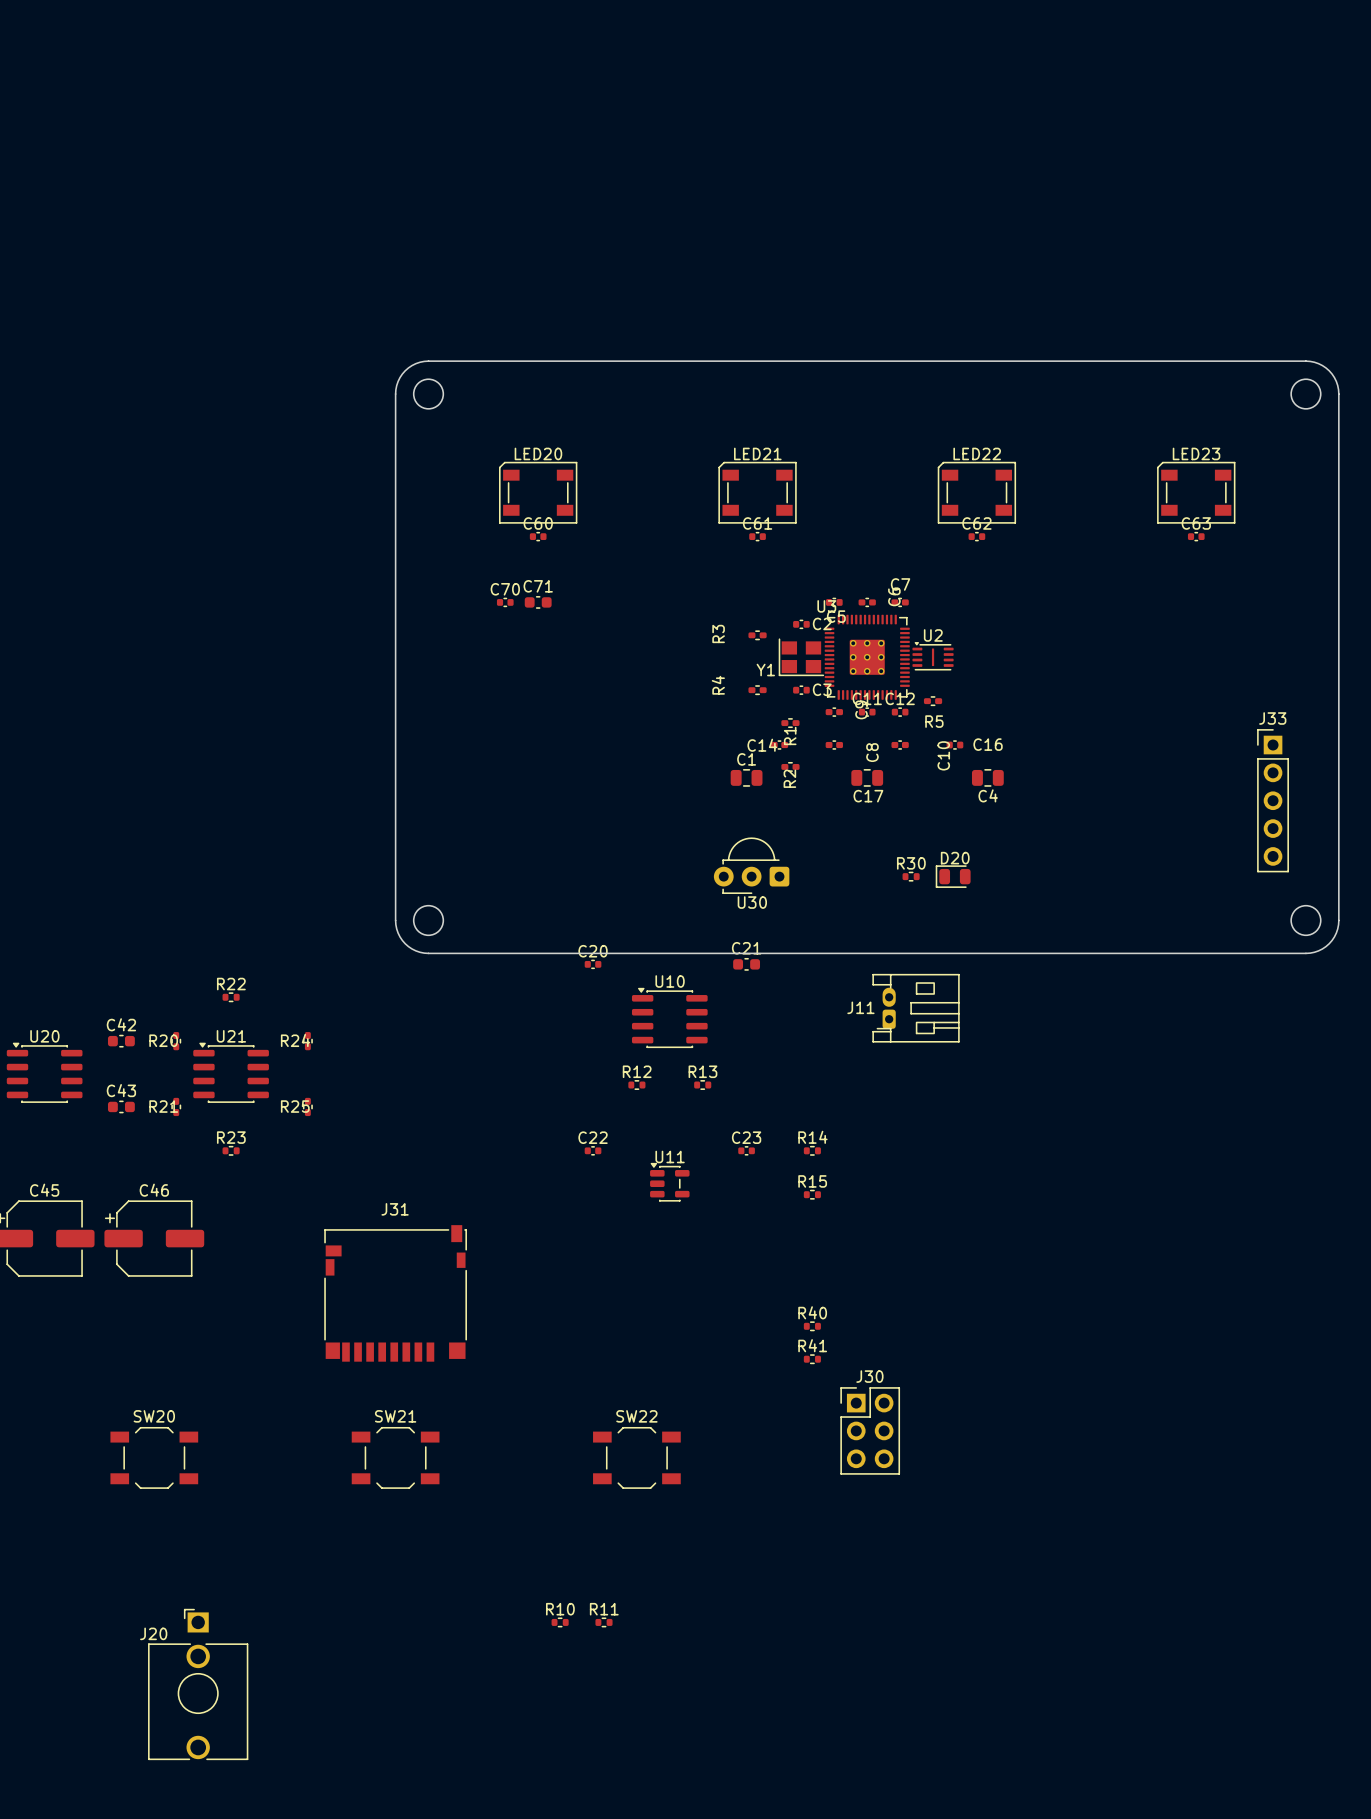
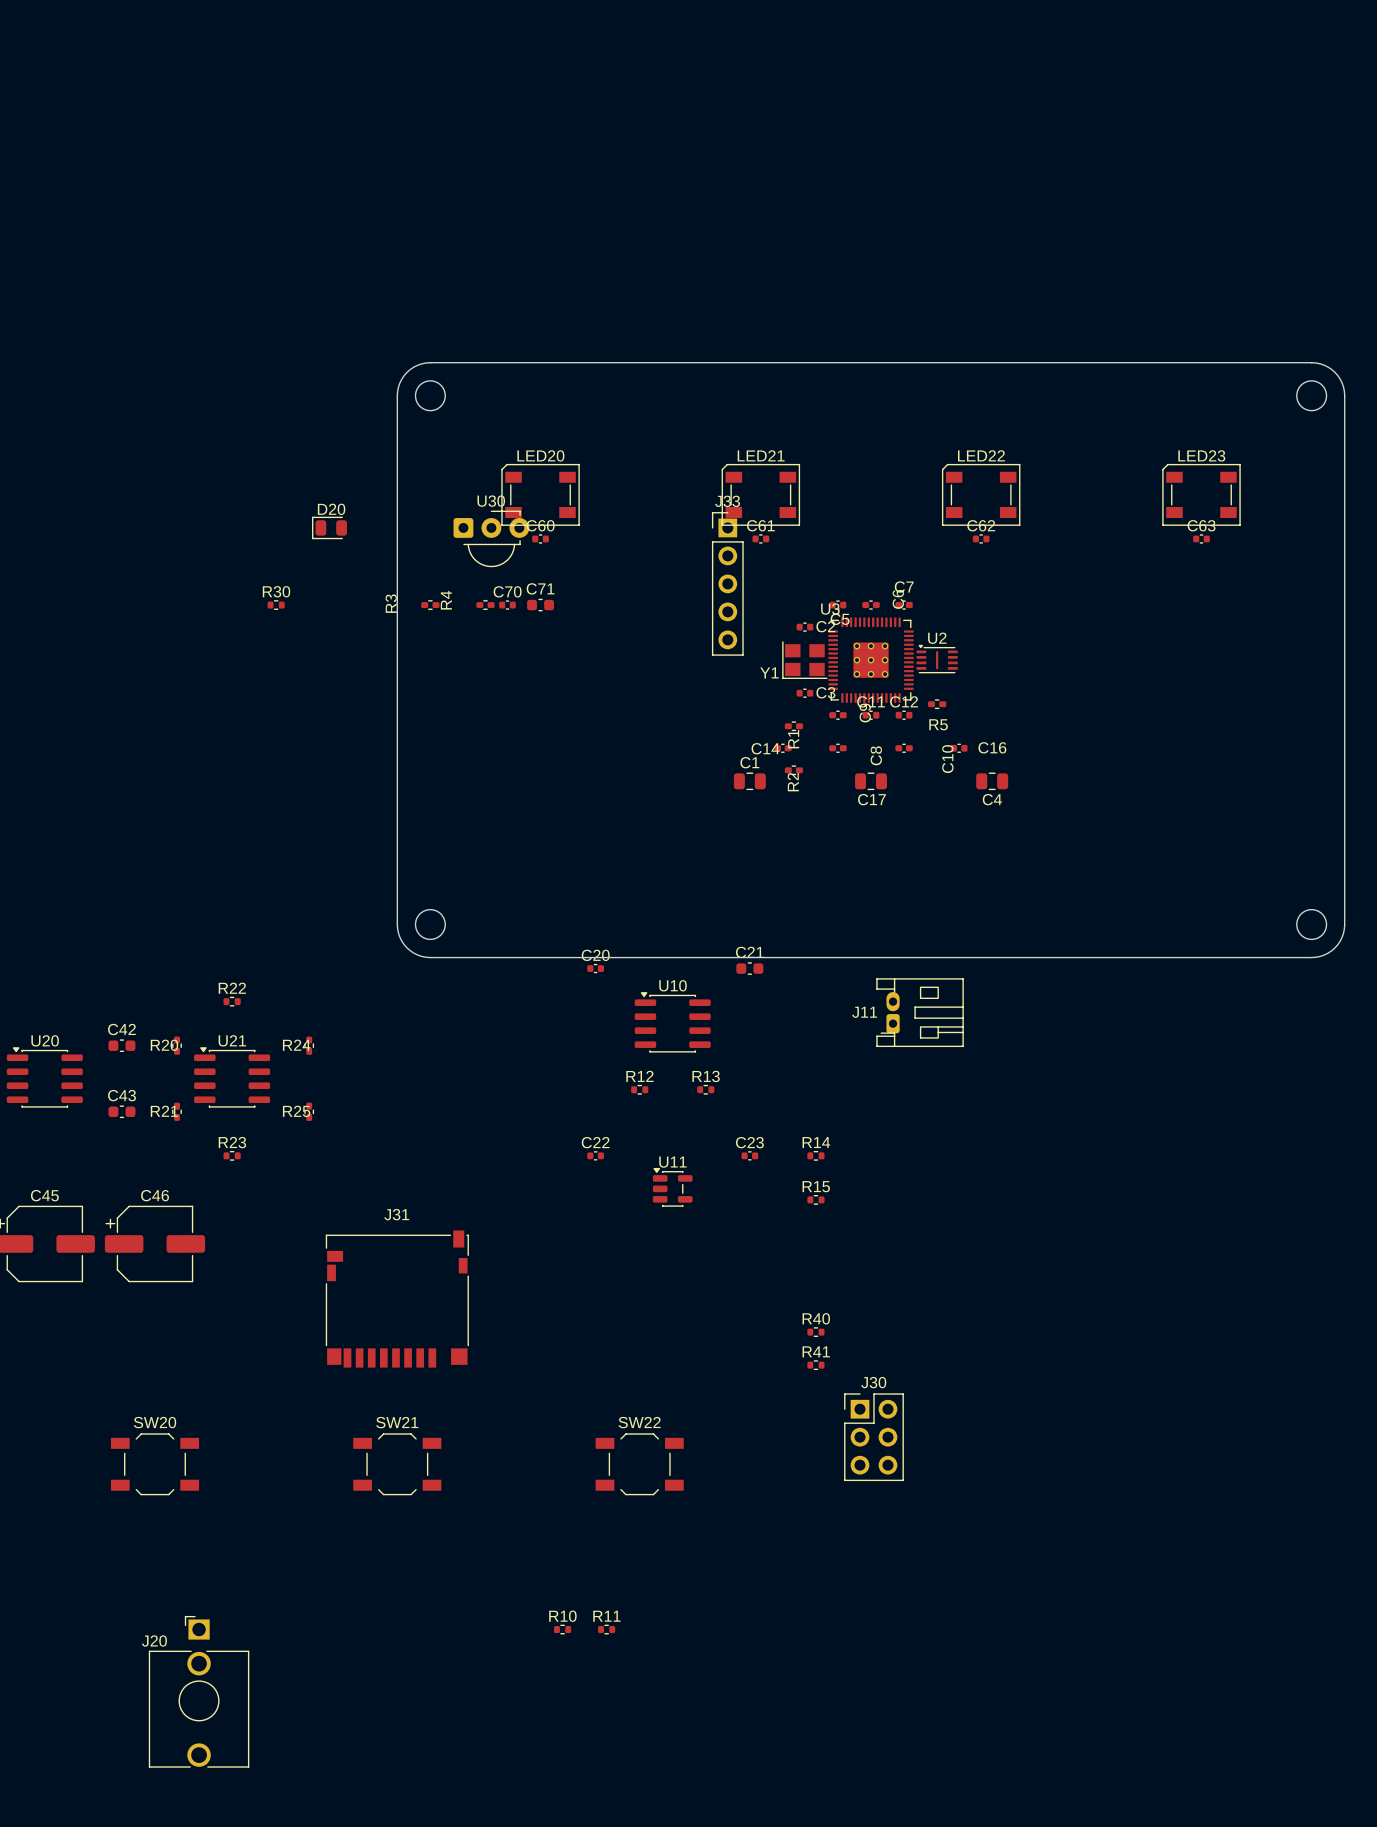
R3 position: (757, 635) -> (430, 605)
R4 position: (757, 690) -> (485, 605)
J33 position: (1273, 800) -> (727, 583)
U30 rotation: 0° (751, 865) -> 180° (491, 538)
U30 position: (751, 865) -> (491, 538)
R30 position: (911, 876) -> (276, 605)
D20 position: (953, 876) -> (329, 527)

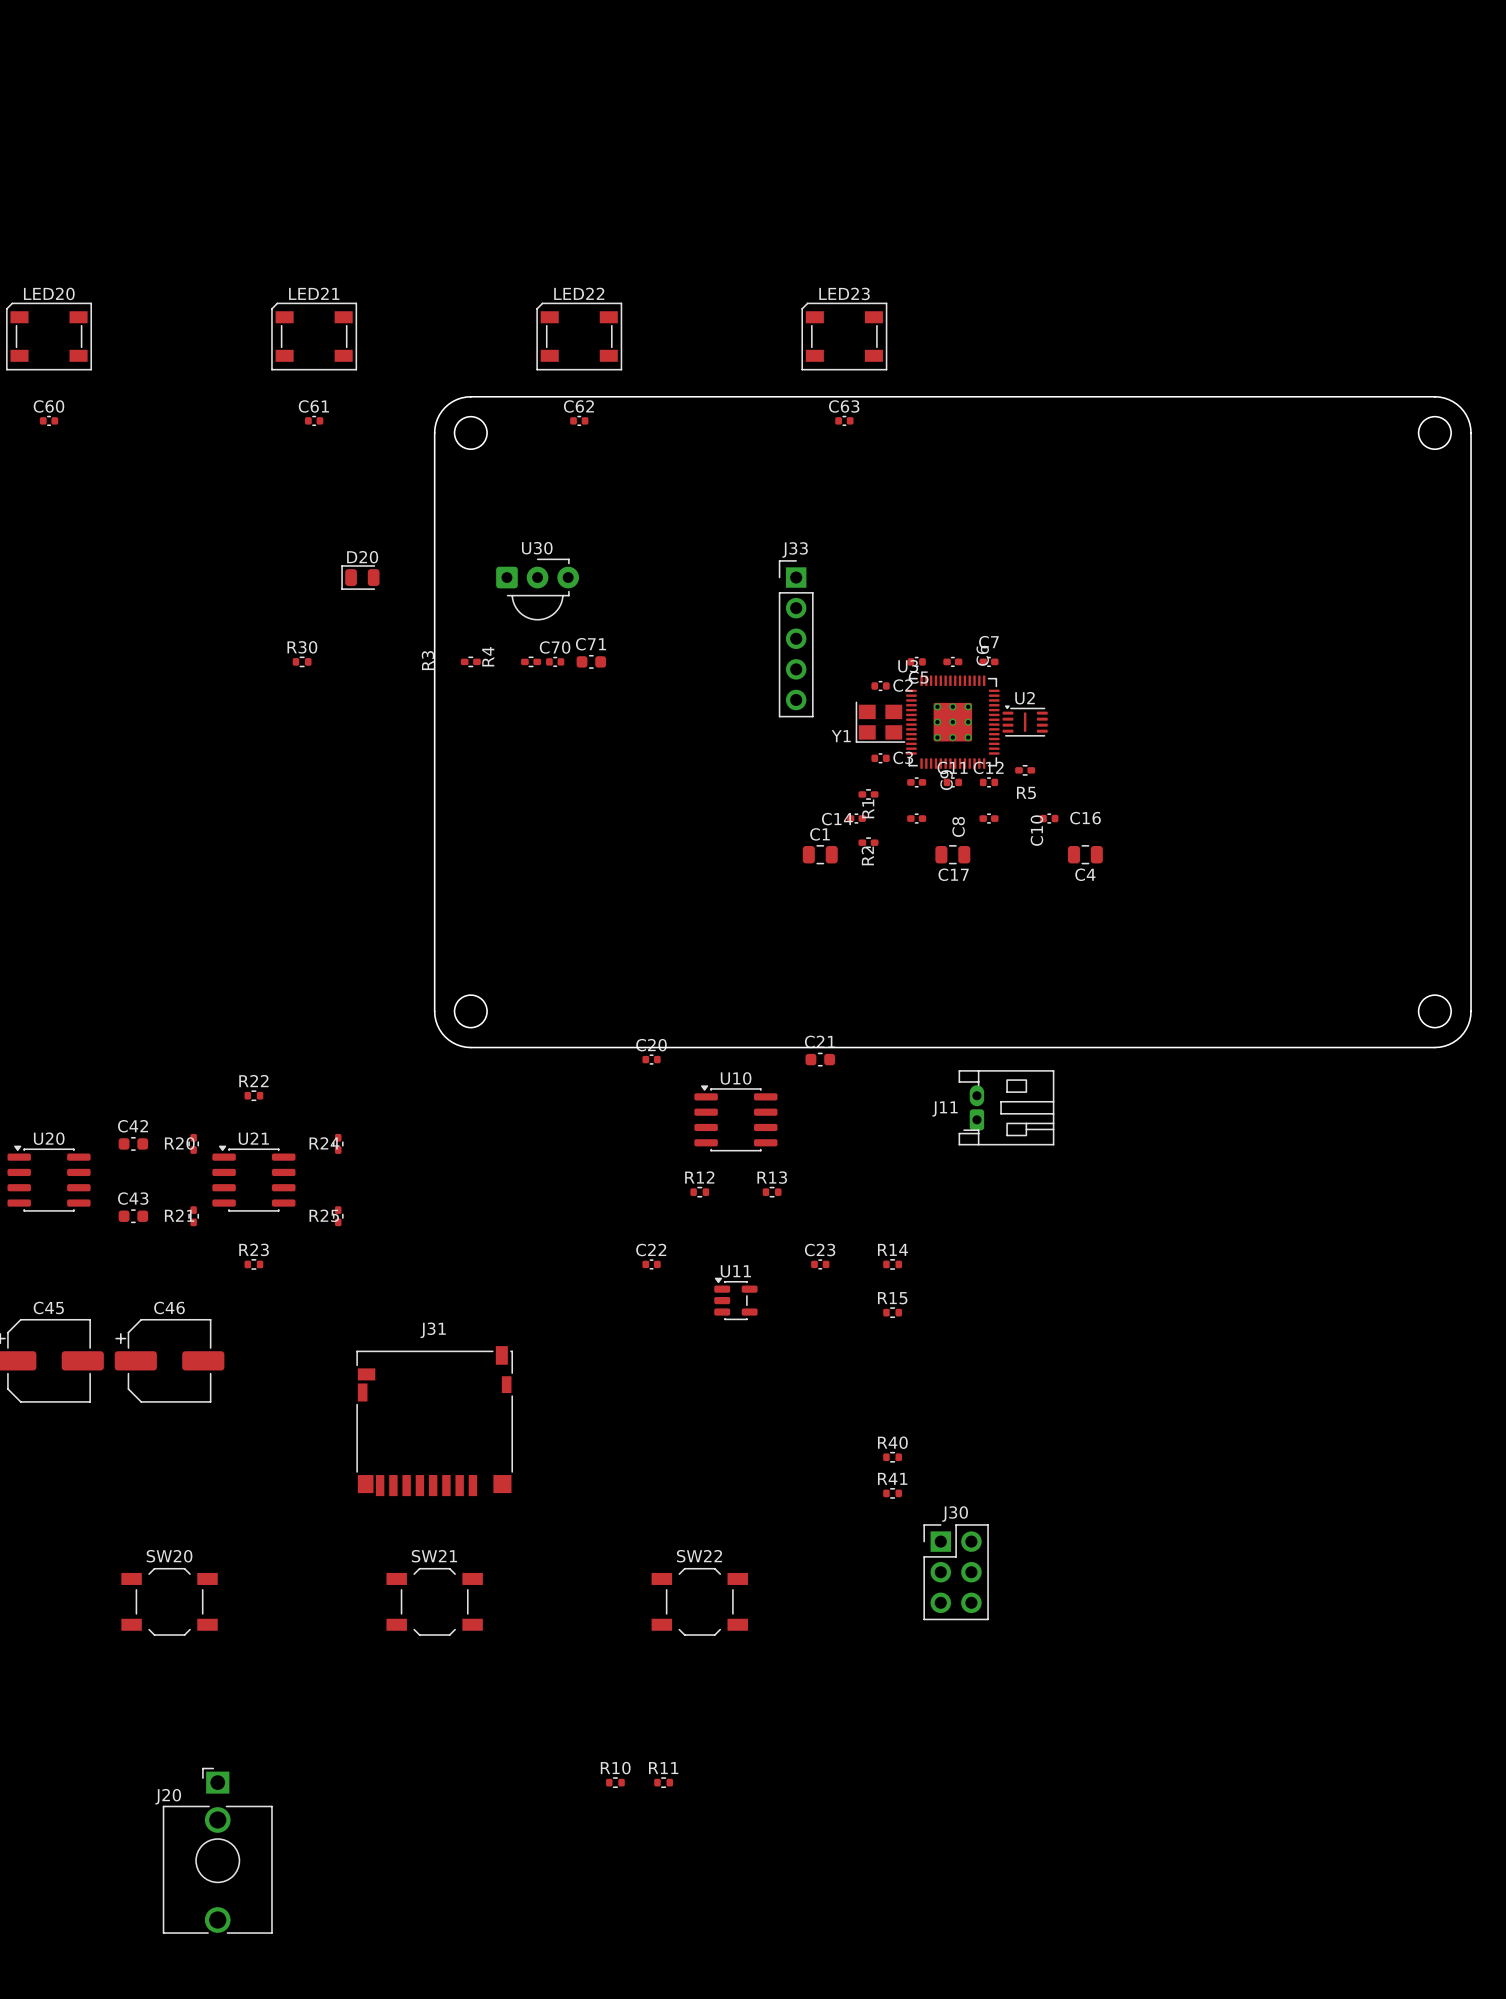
LED20 position: (540, 494) -> (49, 336)
LED21 position: (760, 494) -> (314, 336)
LED22 position: (981, 494) -> (579, 336)
LED23 position: (1201, 494) -> (844, 336)
C60 position: (540, 538) -> (49, 420)
C61 position: (760, 538) -> (314, 420)
C62 position: (981, 538) -> (579, 420)
C63 position: (1201, 538) -> (844, 420)

